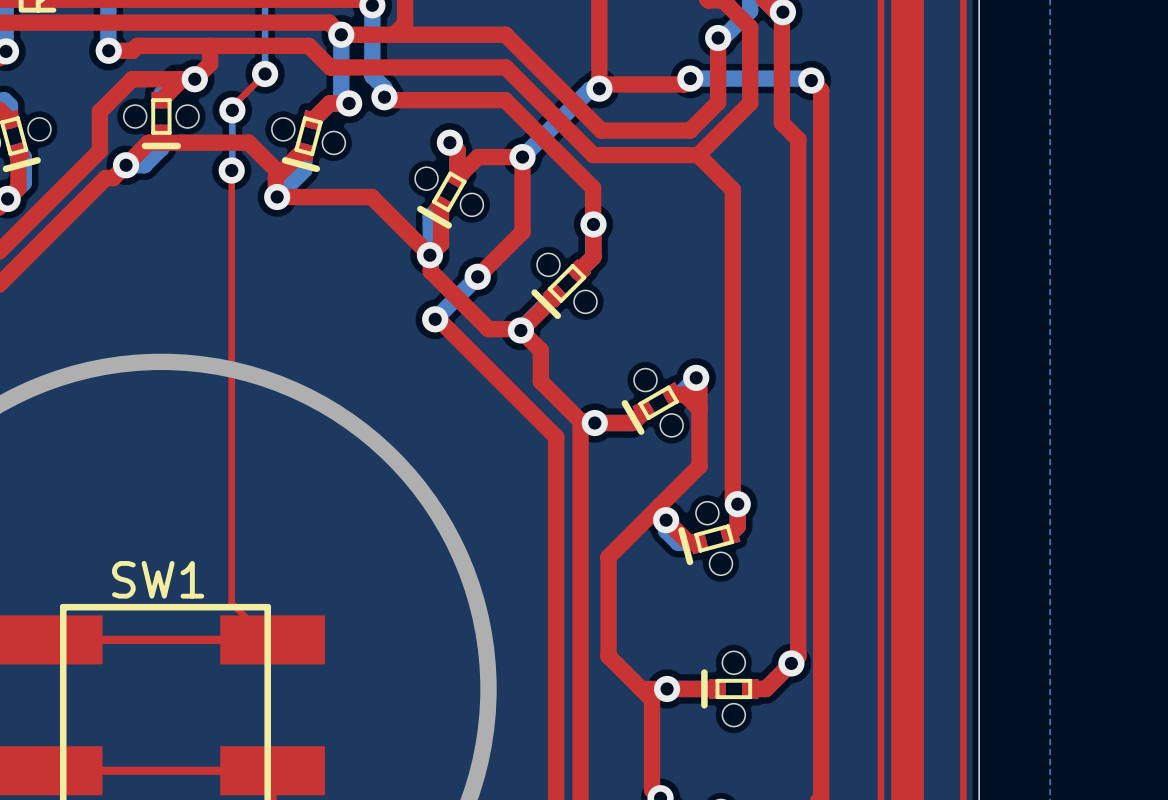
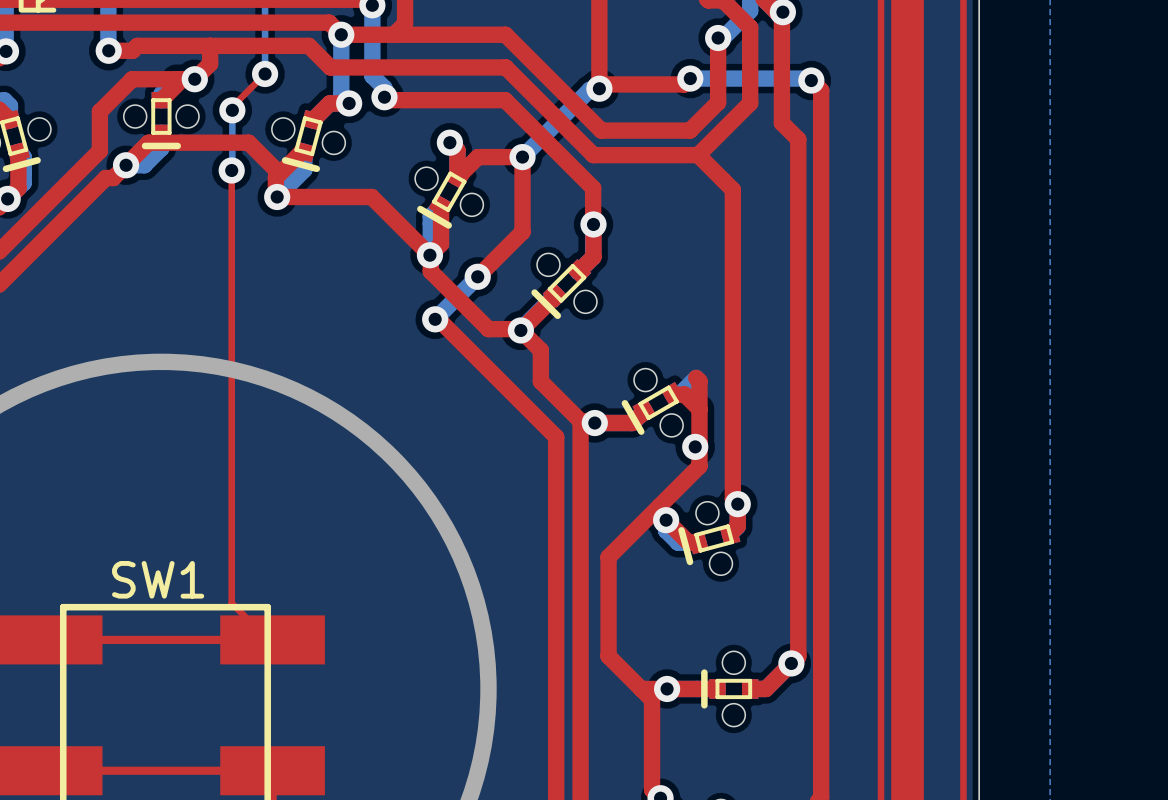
via position: (696, 377) -> (695, 446)

